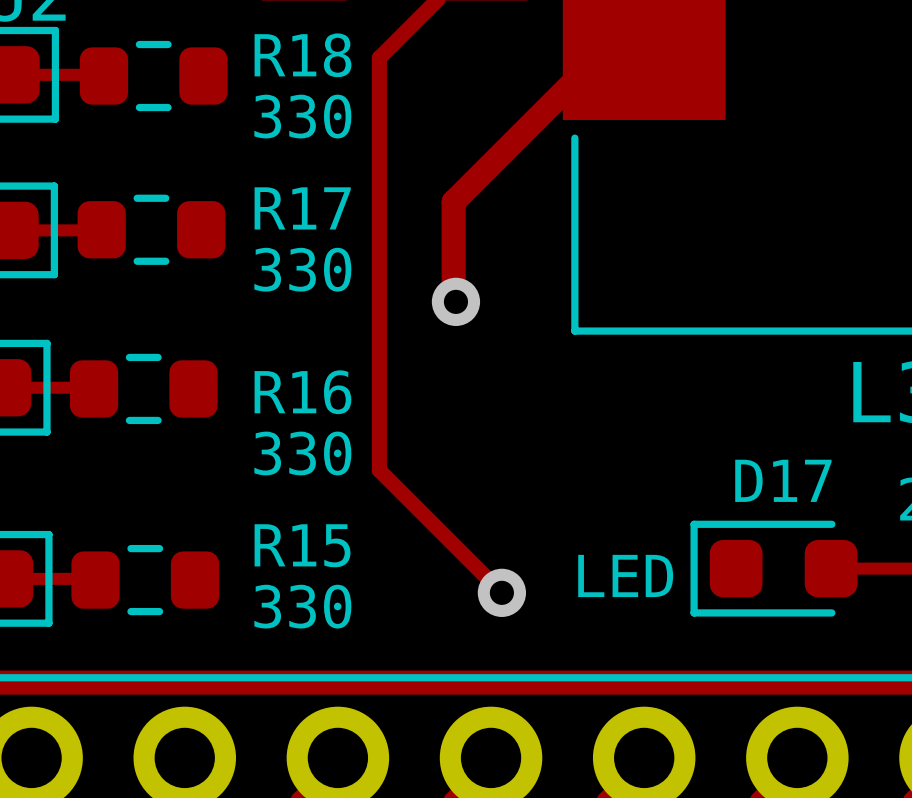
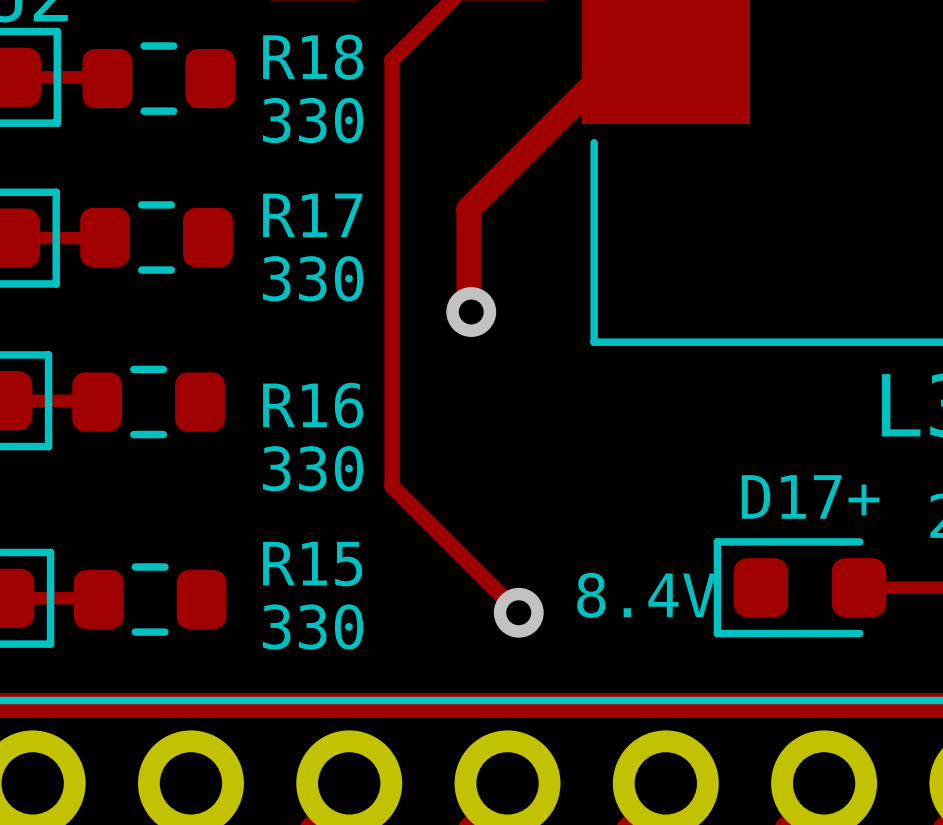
D17 name: D17 (783, 480) -> D17+ (810, 496)
D17 value: LED (625, 575) -> 8.4V (646, 595)

